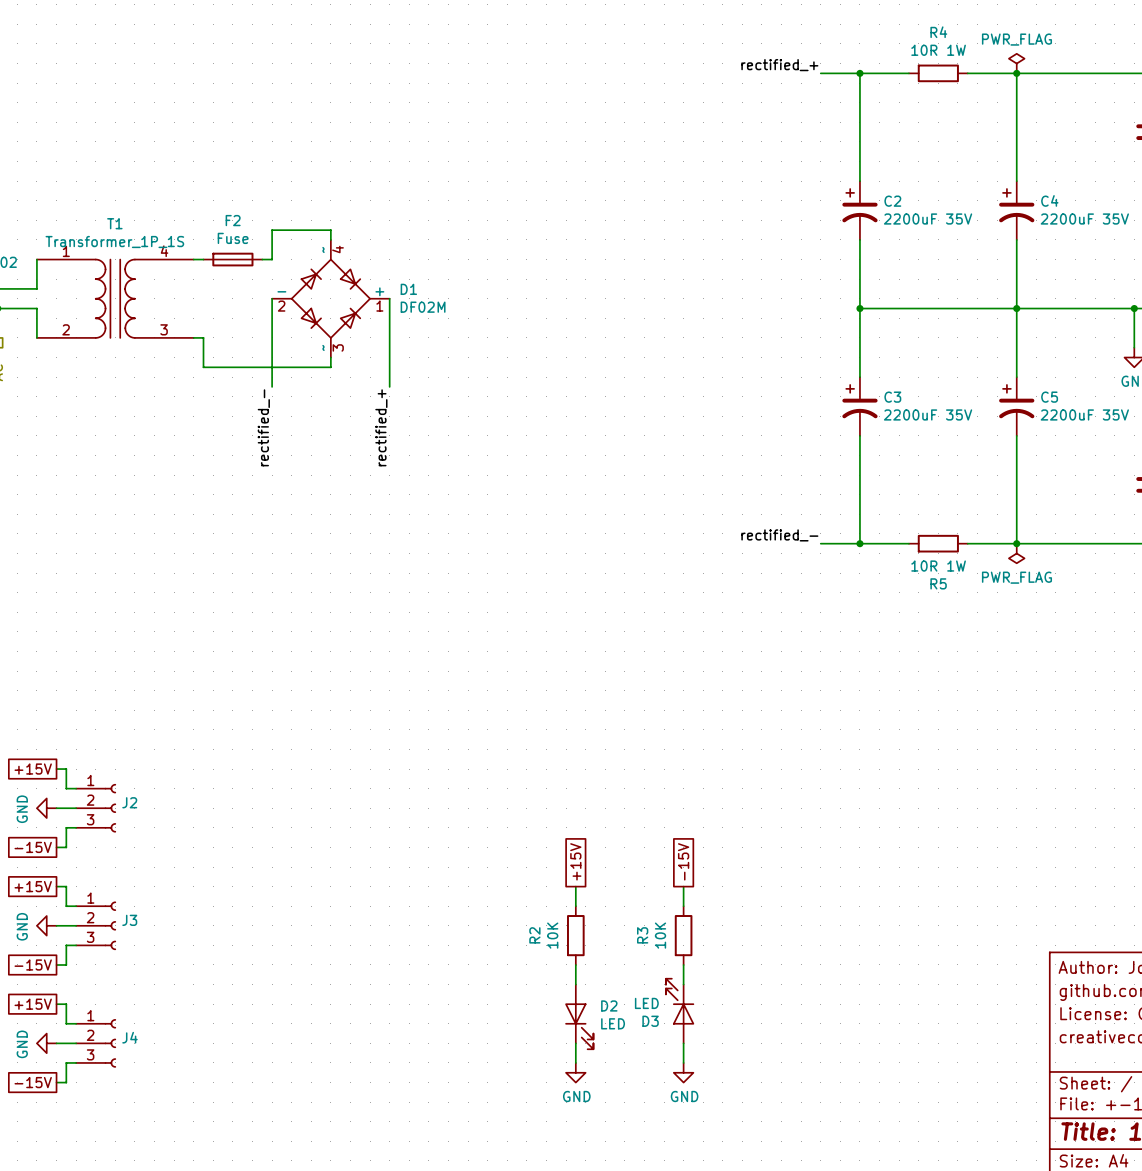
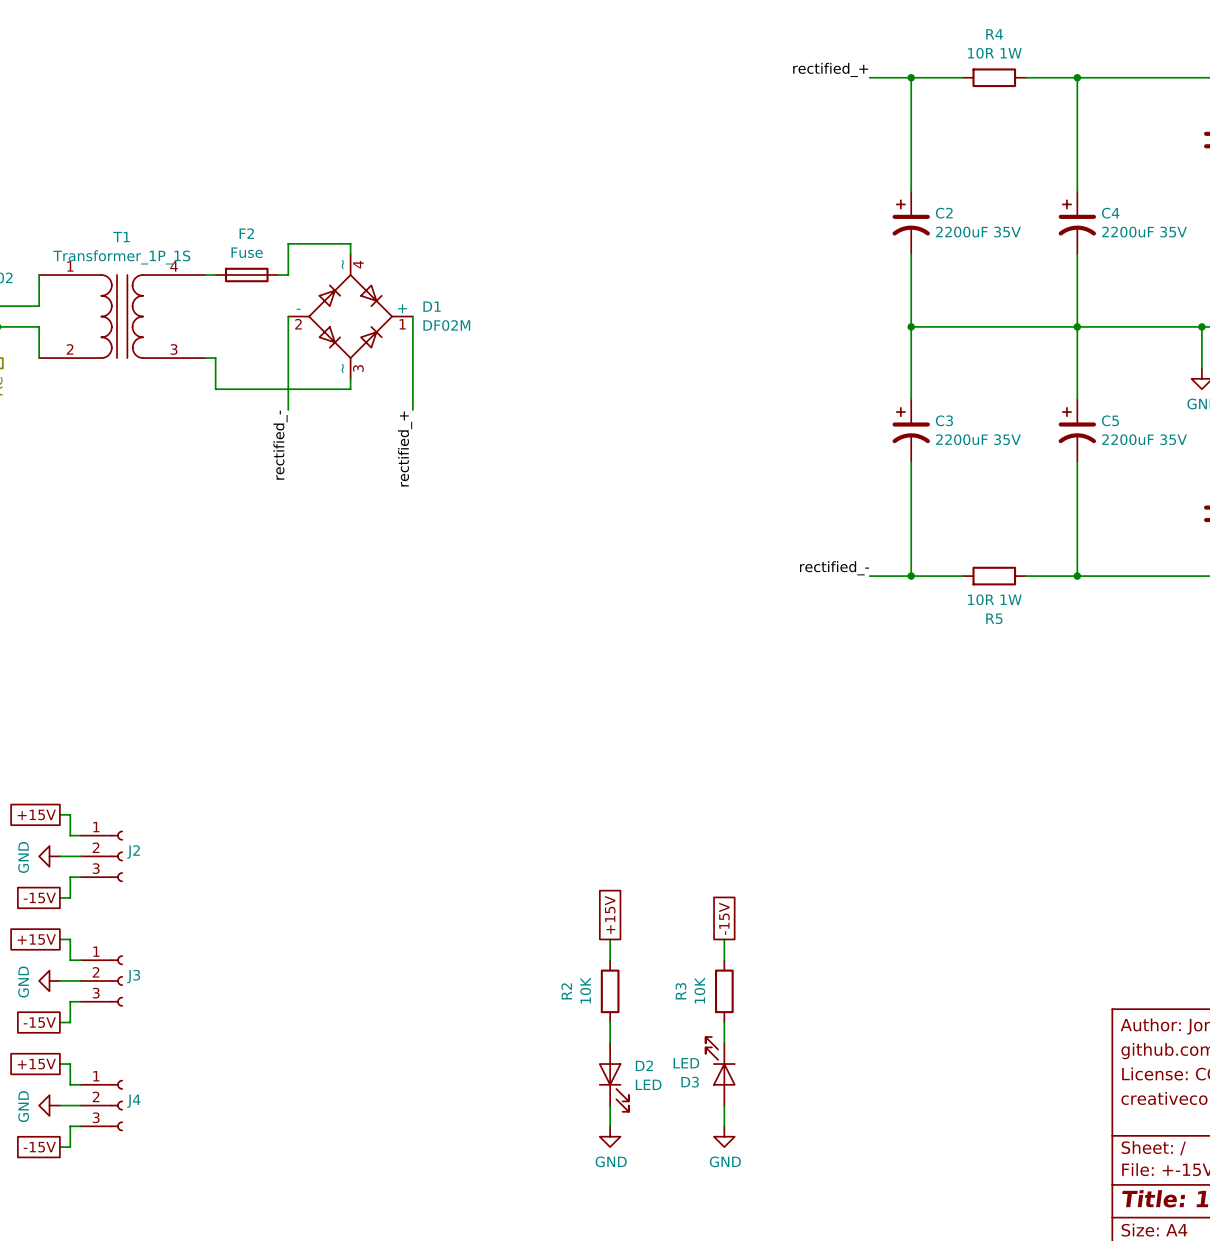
power symbol: PWR_FLAG (1016, 63) -> none
power symbol: PWR_FLAG (1016, 553) -> none

